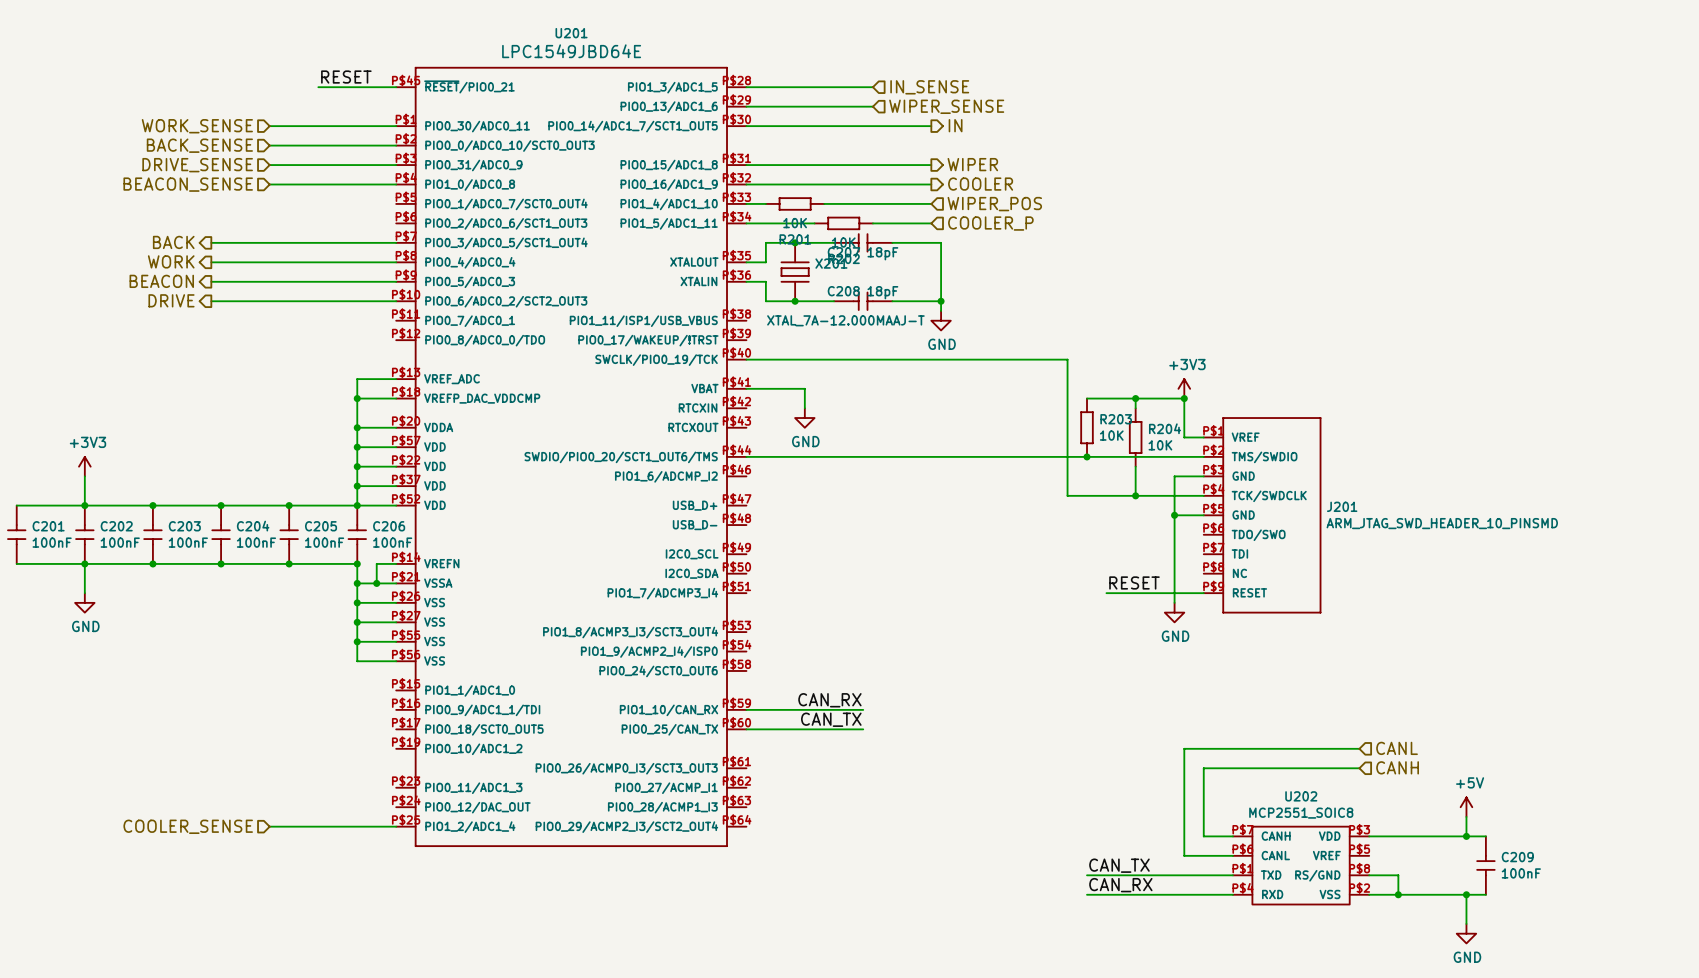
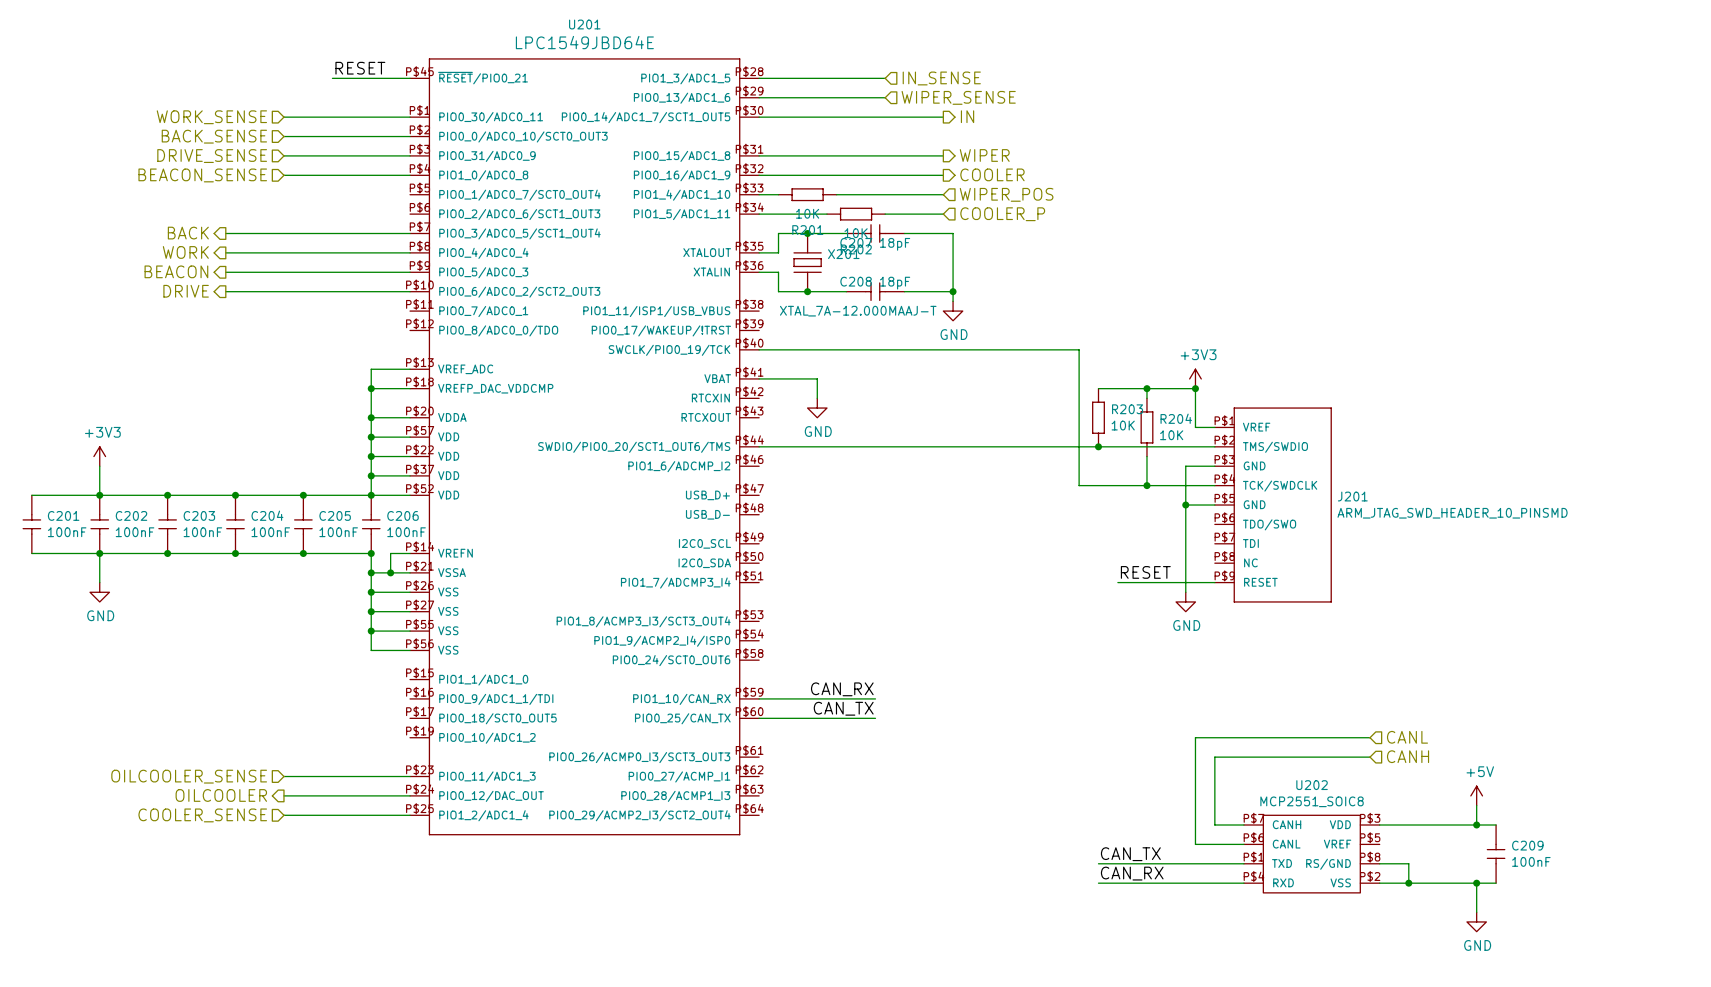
hierarchical label: none -> OILCOOLER_SENSE (189, 776)
wire: none -> (283, 776) (410, 776)
hierarchical label: none -> OILCOOLER (221, 795)
wire: none -> (283, 795) (410, 795)

